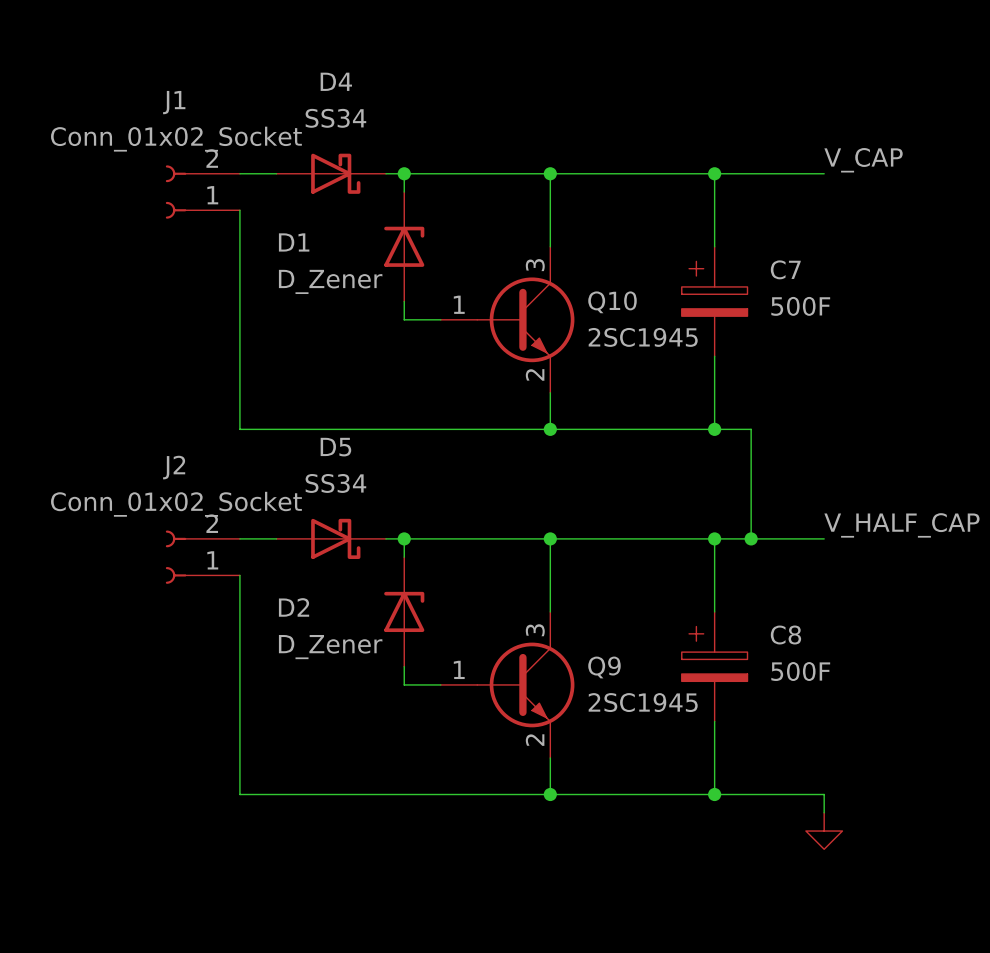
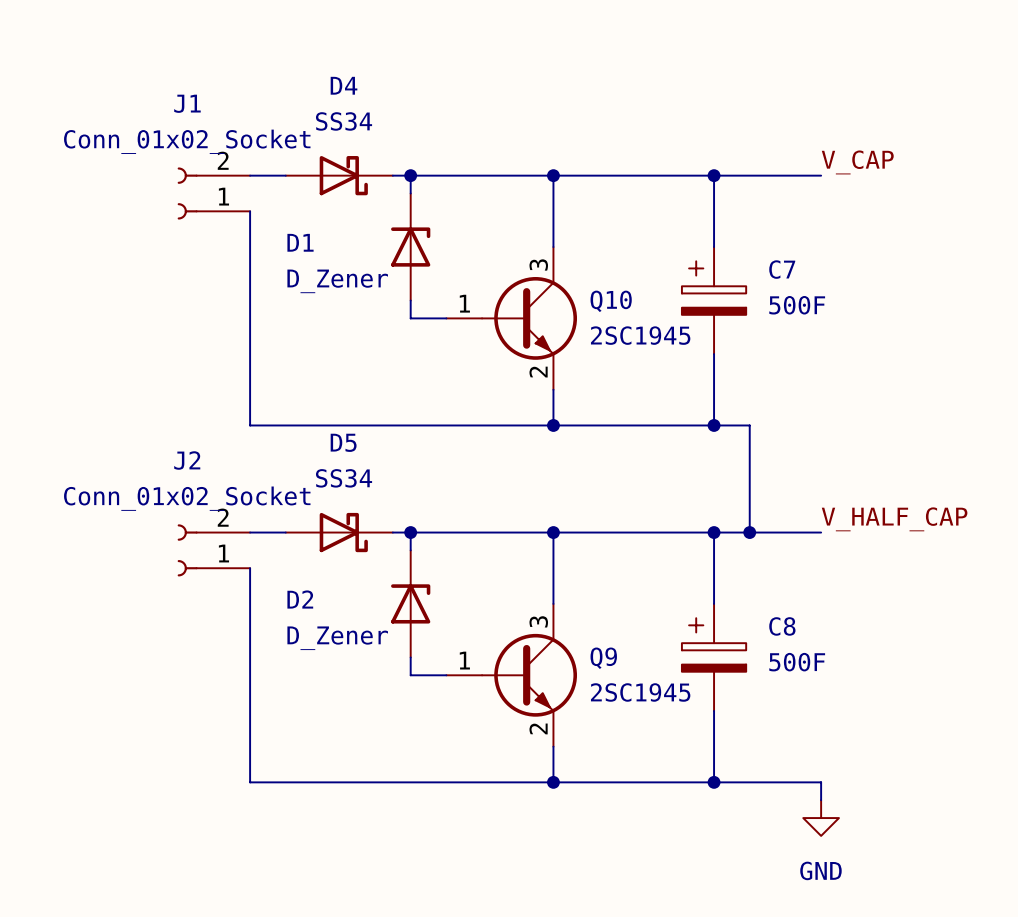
power symbol text: none -> GND (820, 870)

